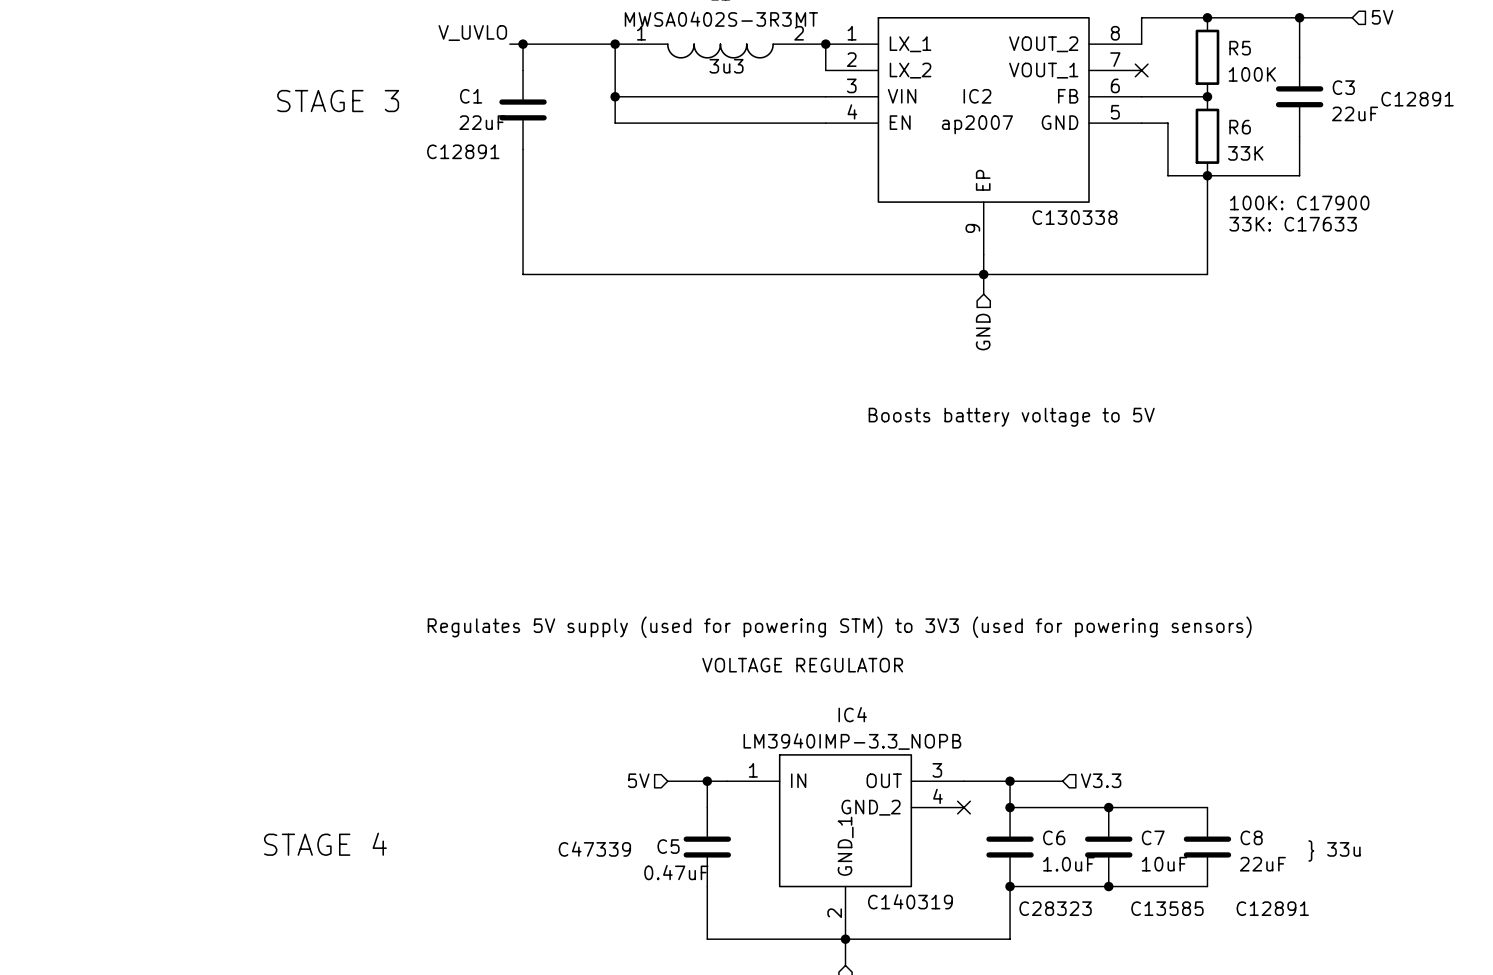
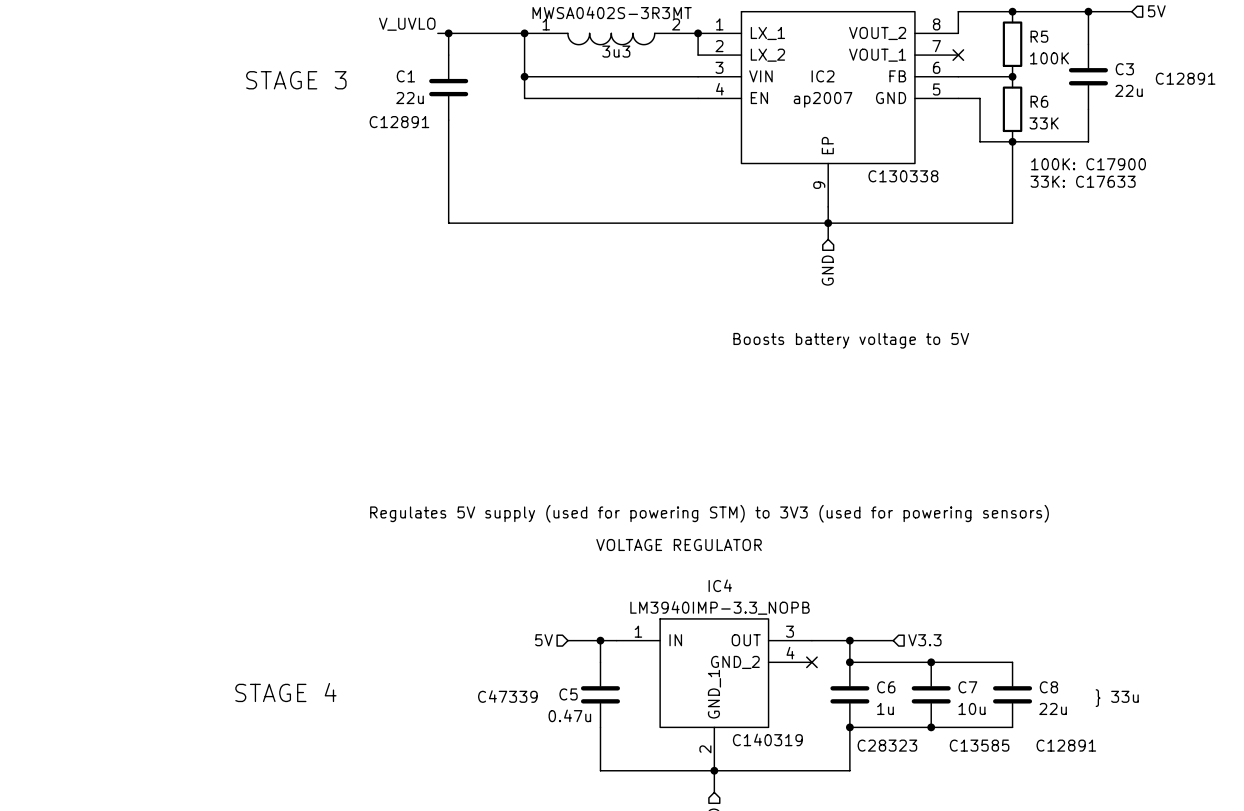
C3 value: 22uF (1355, 113) -> 22u (1128, 90)
C1 value: 22uF (482, 122) -> 22u (410, 98)
C6 value: 1.0uF (1068, 864) -> 1u (885, 708)
C7 value: 10uF (1164, 864) -> 10u (971, 708)
C8 value: 22uF (1262, 864) -> 22u (1053, 708)
C5 value: 0.47uF (676, 872) -> 0.47u (569, 715)

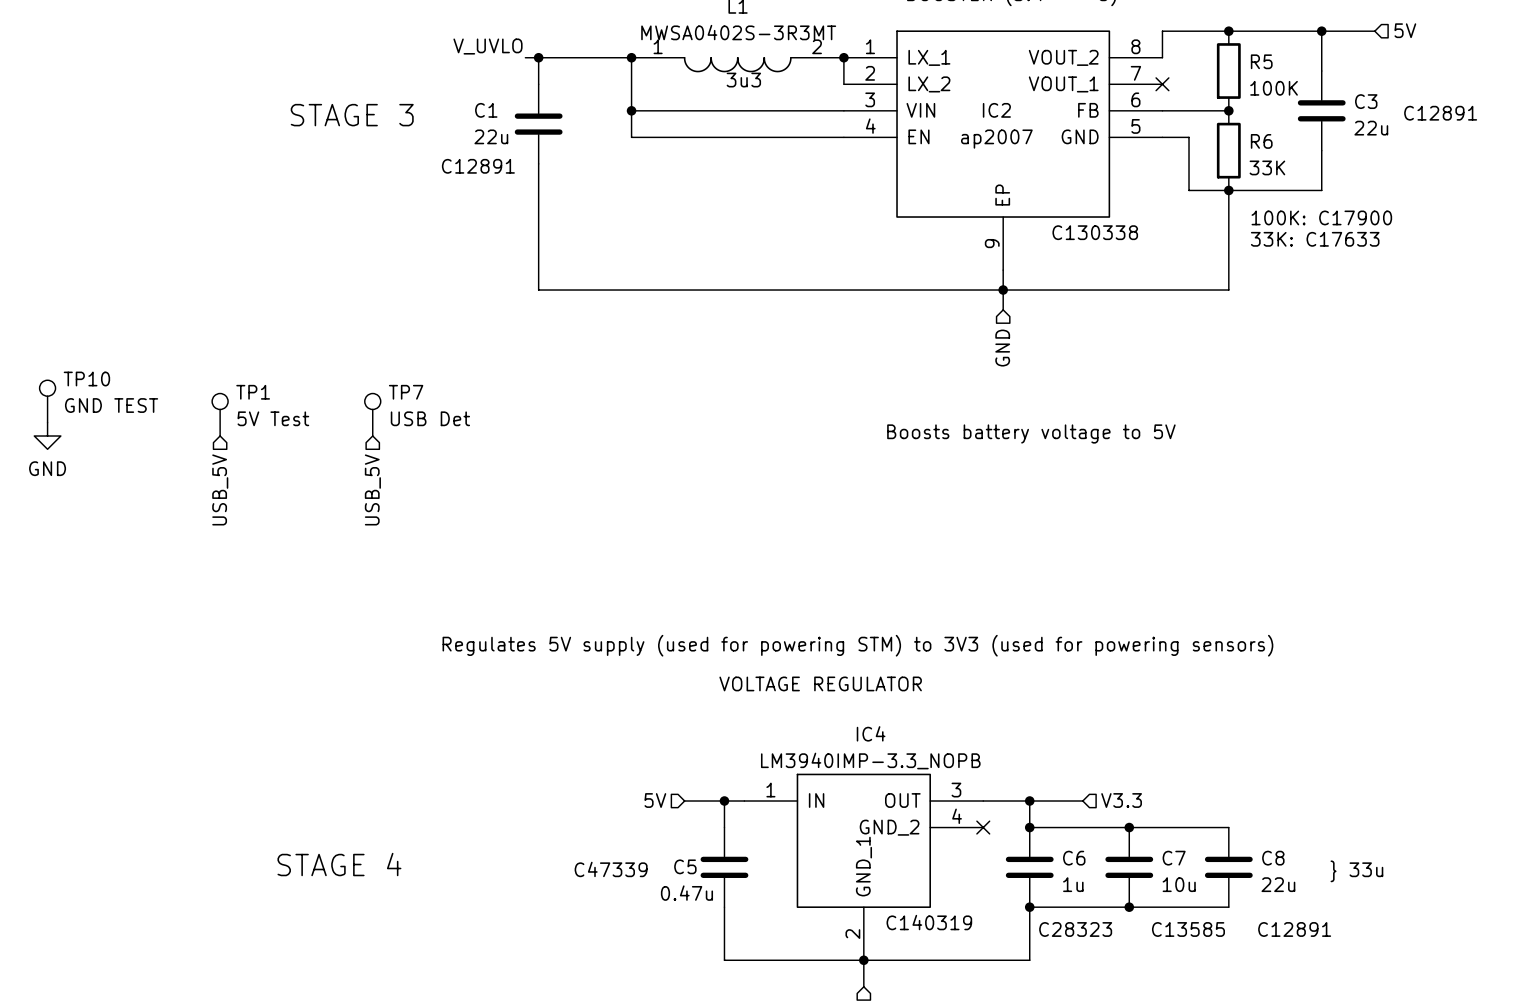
TP10: none -> GND TEST (47, 401)
TP1: none -> 5V Test (220, 414)
TP7: none -> USB Det (372, 414)
power symbol: none -> GND (47, 436)
hierarchical label: none -> USB_5V (220, 489)
hierarchical label: none -> USB_5V (372, 489)

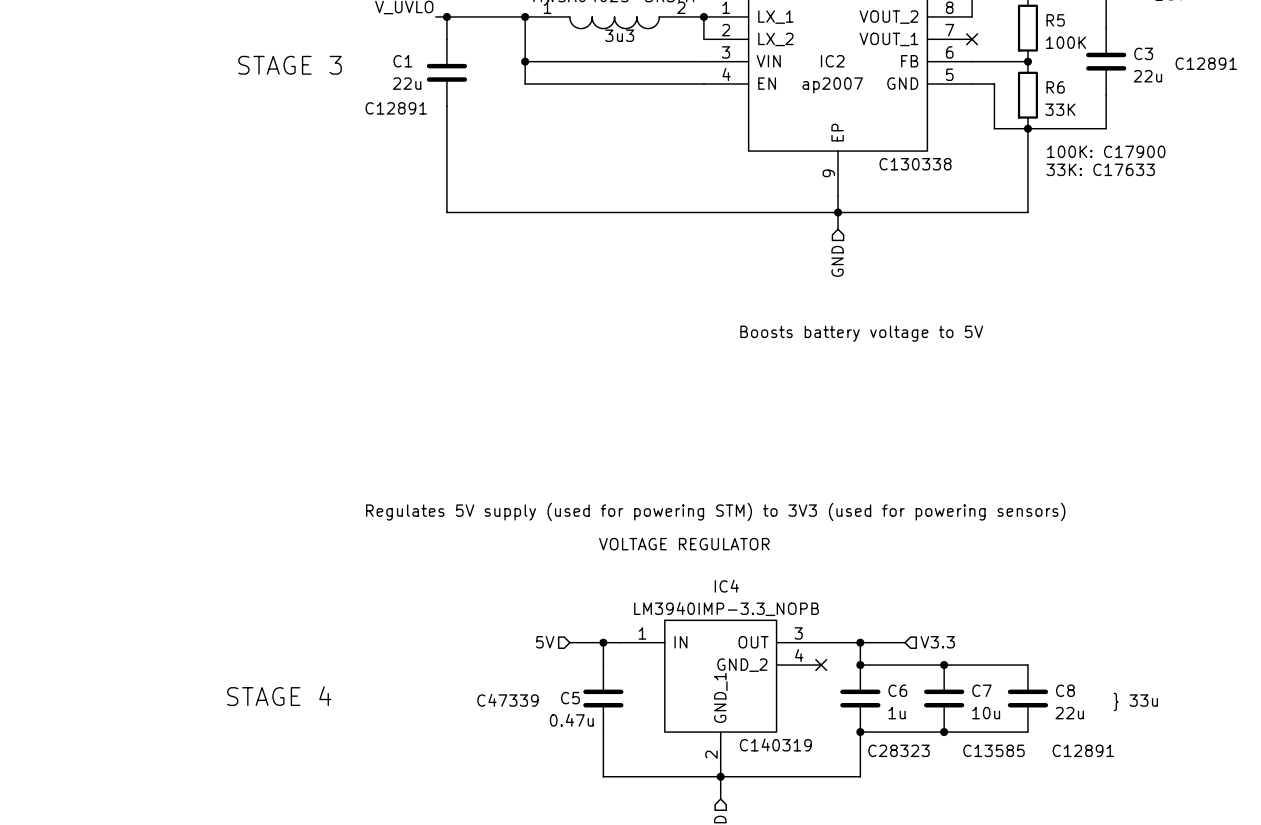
TP10: GND TEST (47, 401) -> none
TP1: 5V Test (220, 414) -> none
TP7: USB Det (372, 414) -> none
power symbol: GND (47, 436) -> none
hierarchical label: USB_5V (220, 489) -> none
hierarchical label: USB_5V (372, 489) -> none

